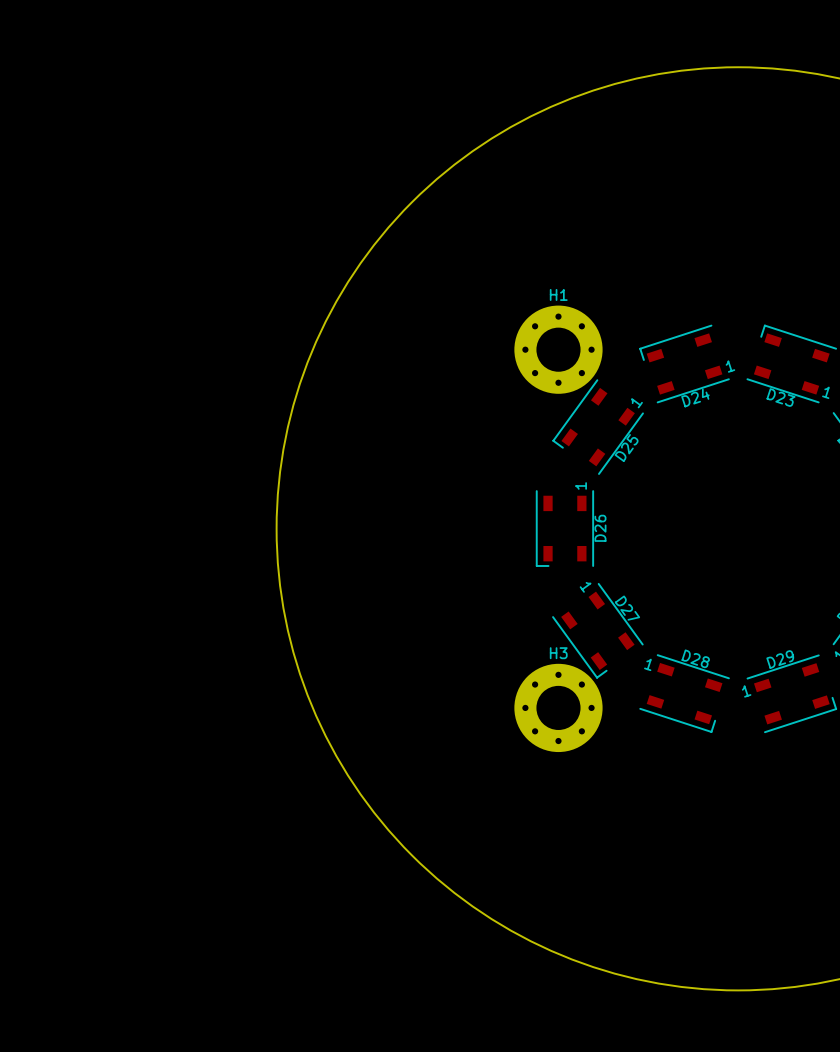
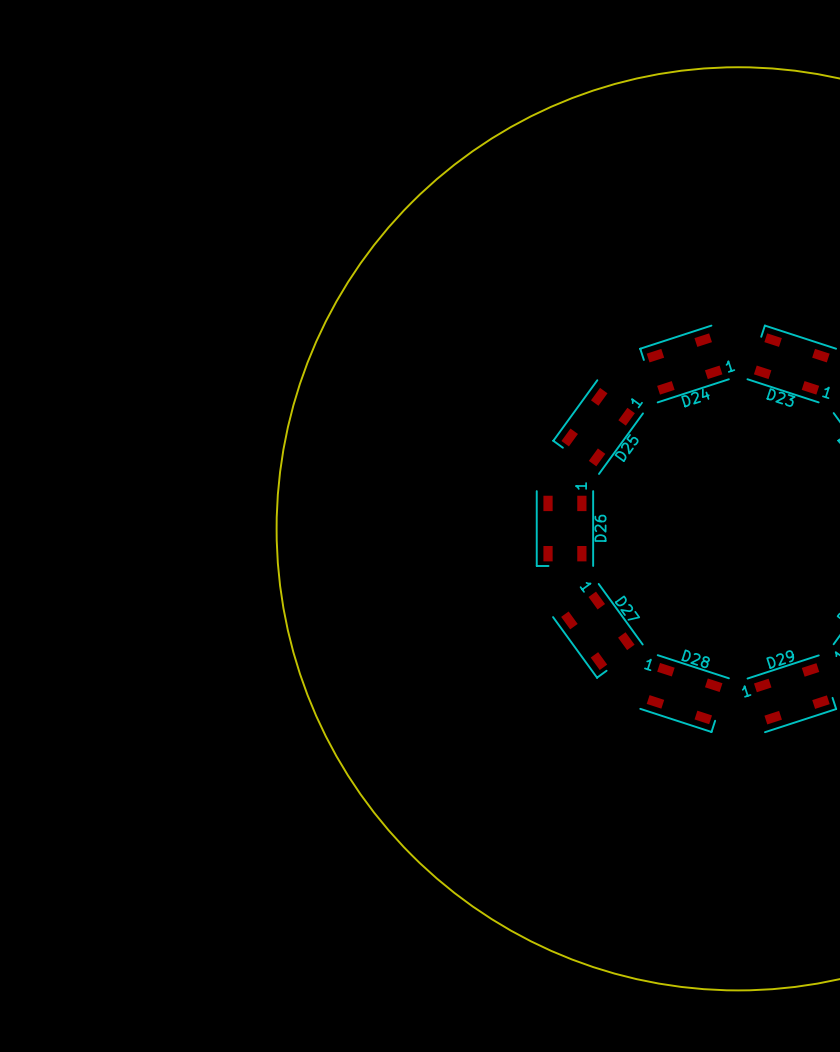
H1: (558, 349) -> none
H3: (558, 707) -> none

